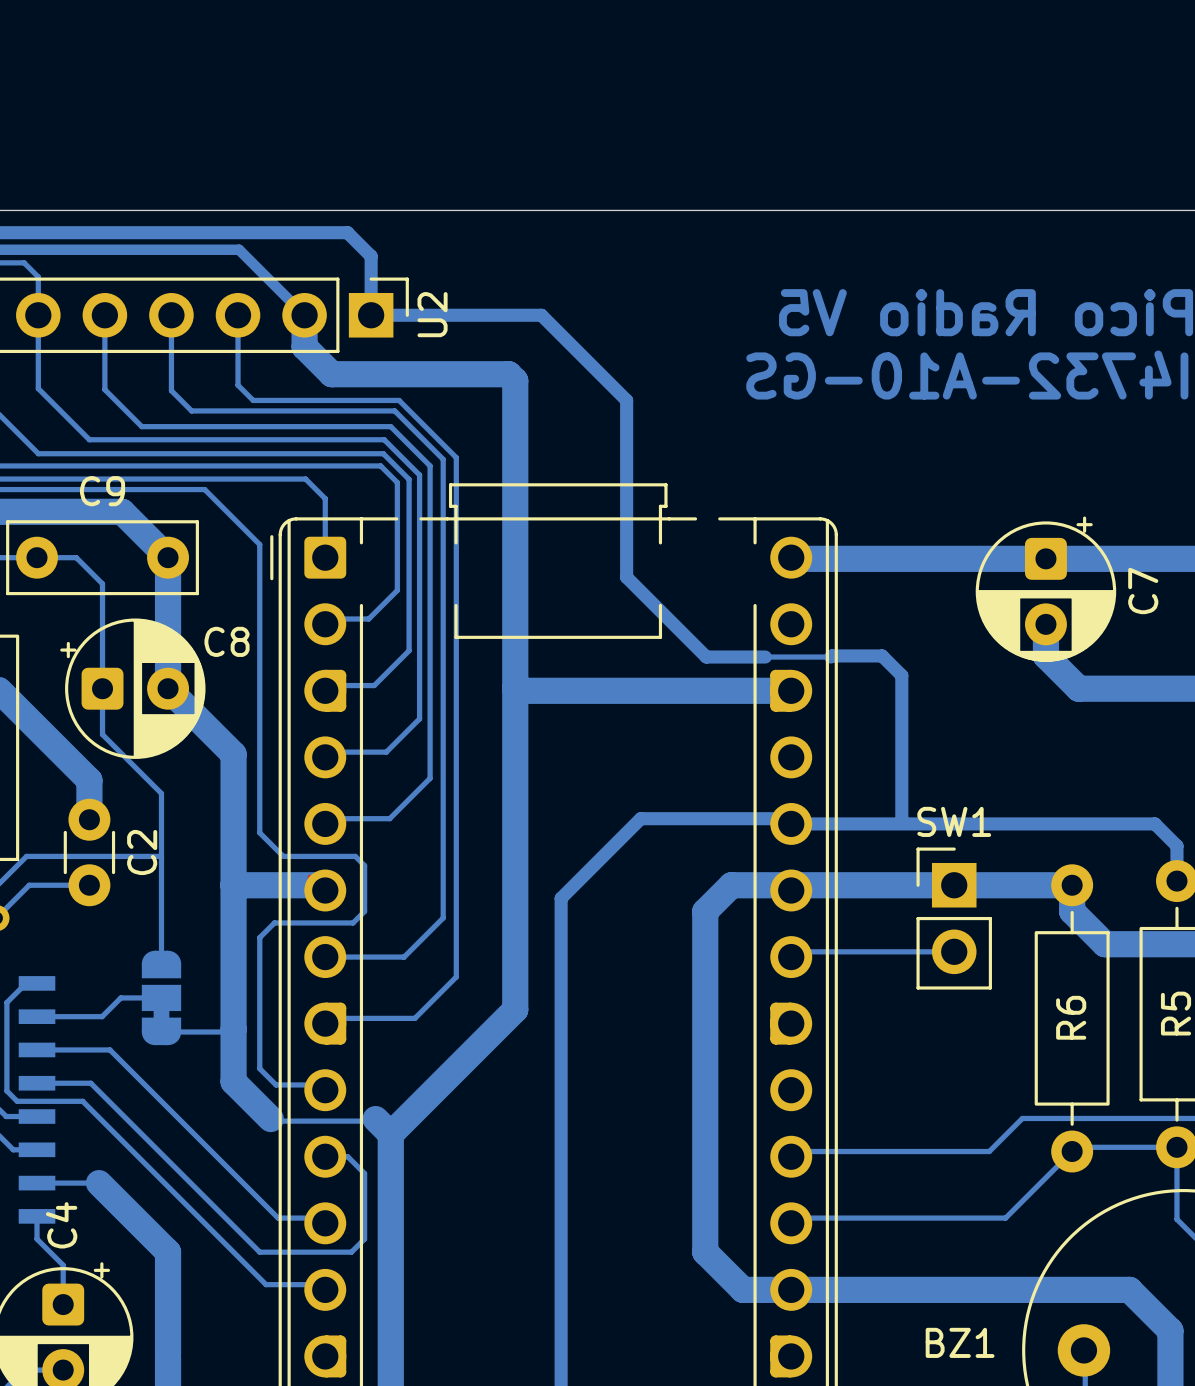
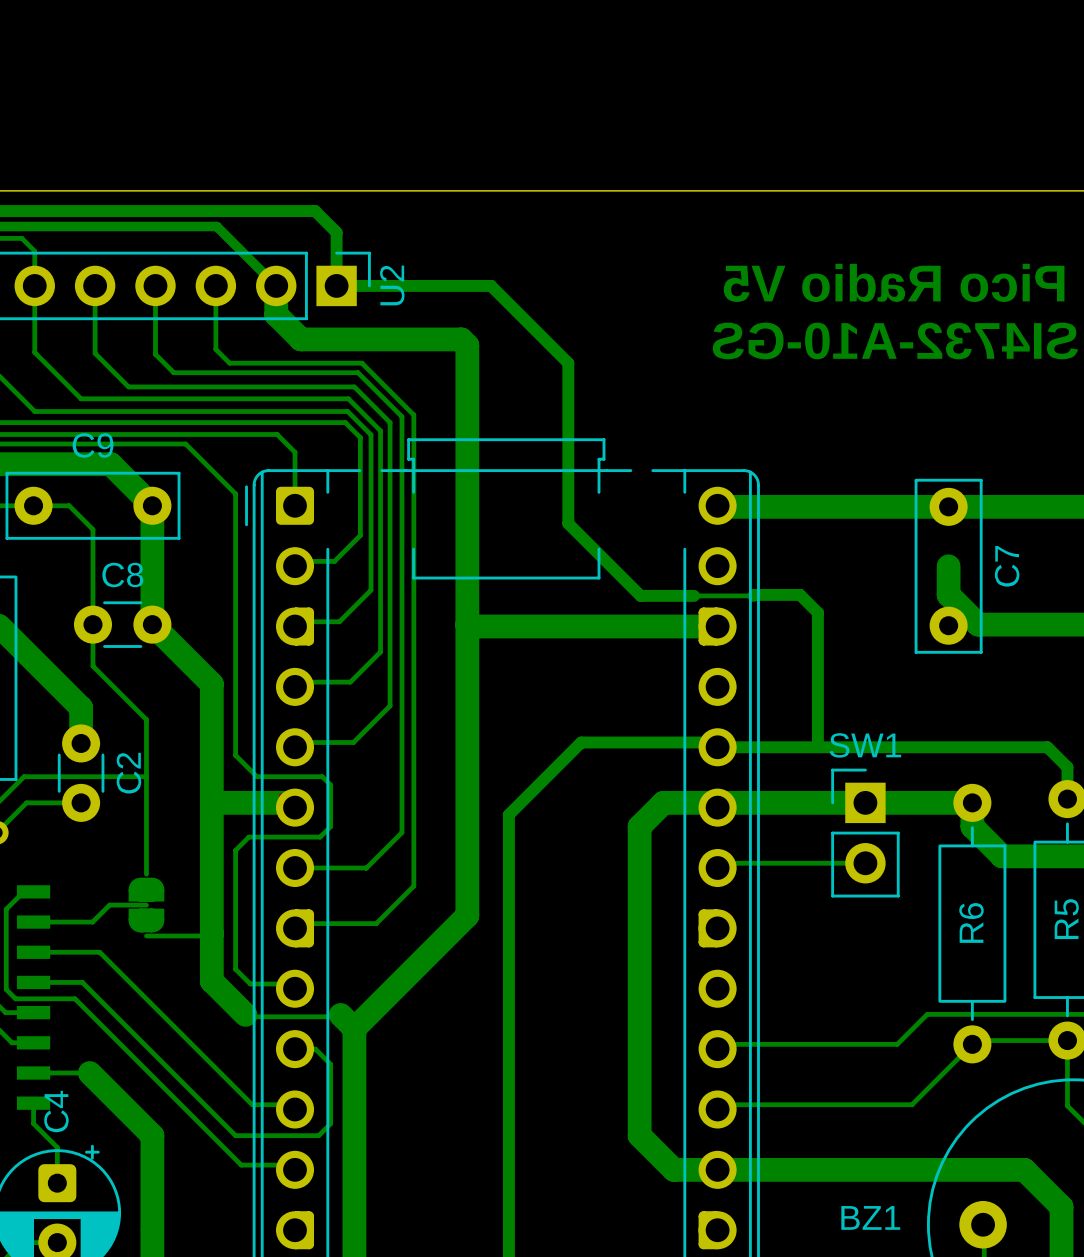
C7 footprint: [975, 516, 1117, 662] -> [914, 478, 983, 654]
C8 footprint: [60, 618, 206, 759] -> [73, 601, 172, 648]
C8 name position: C8 (227, 641) -> C8 (122, 575)
part footprint: [141, 950, 182, 1046] -> [128, 877, 165, 933]

